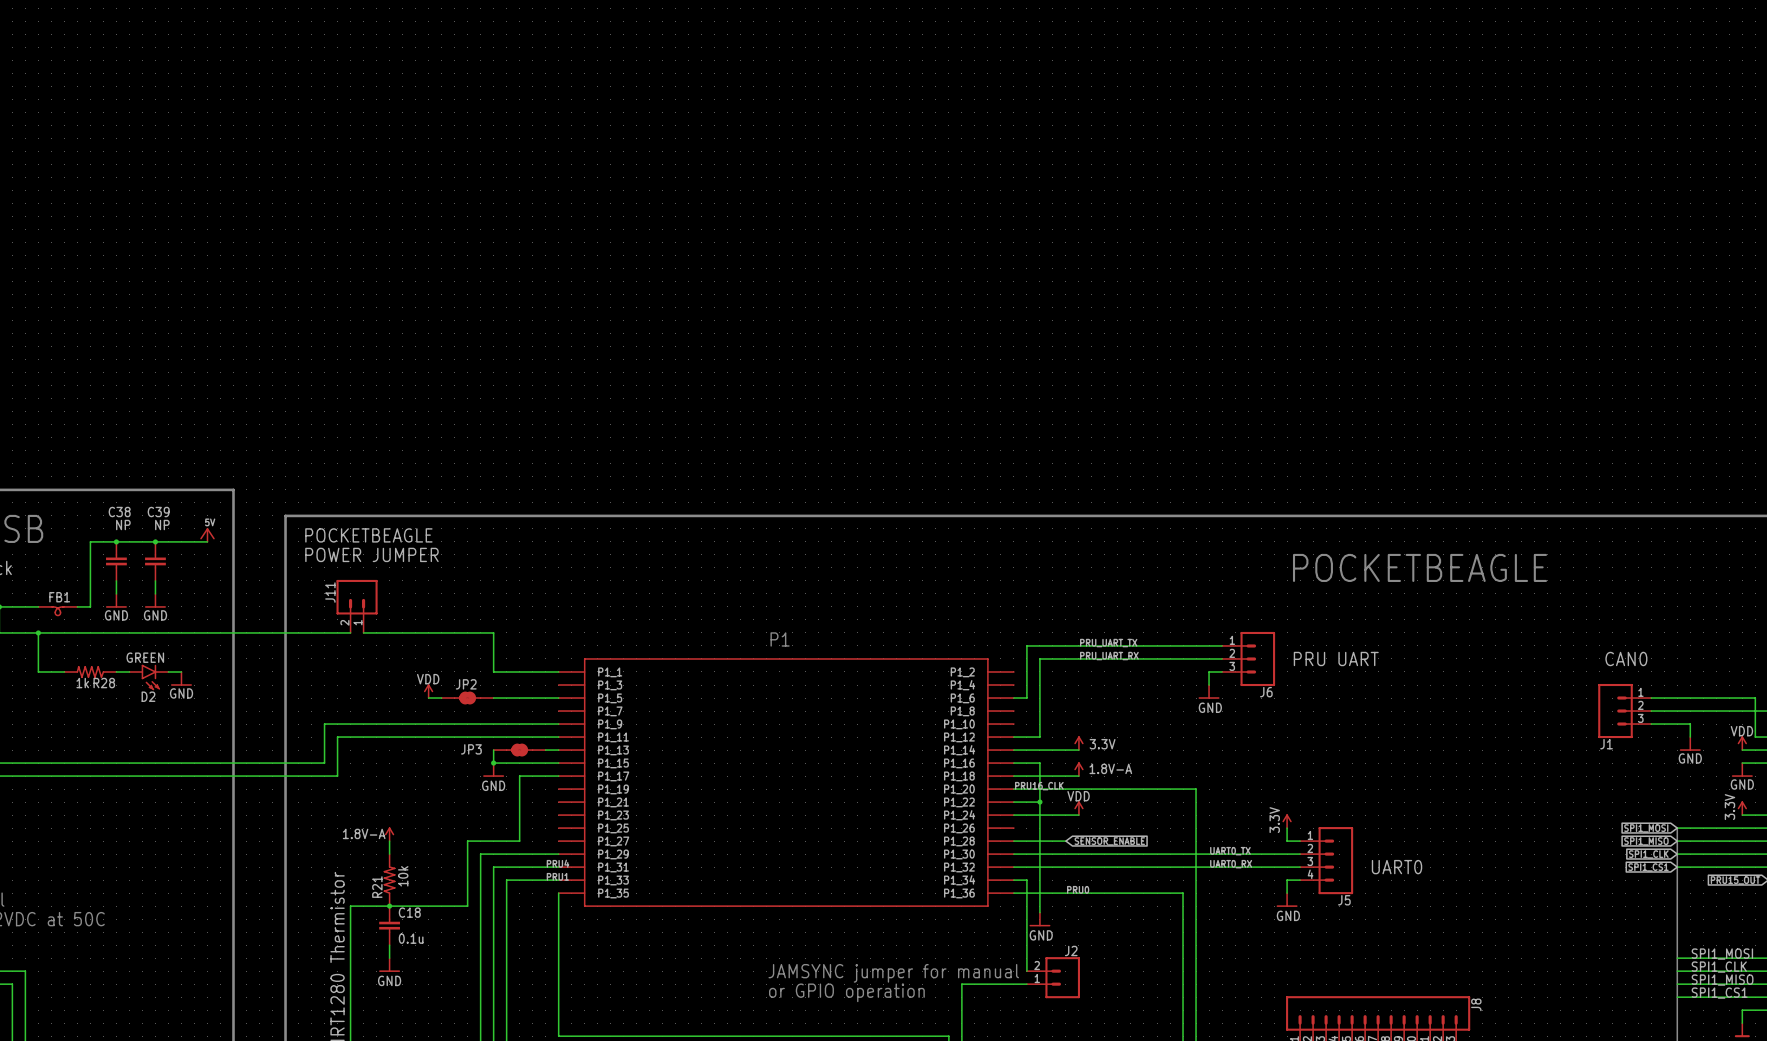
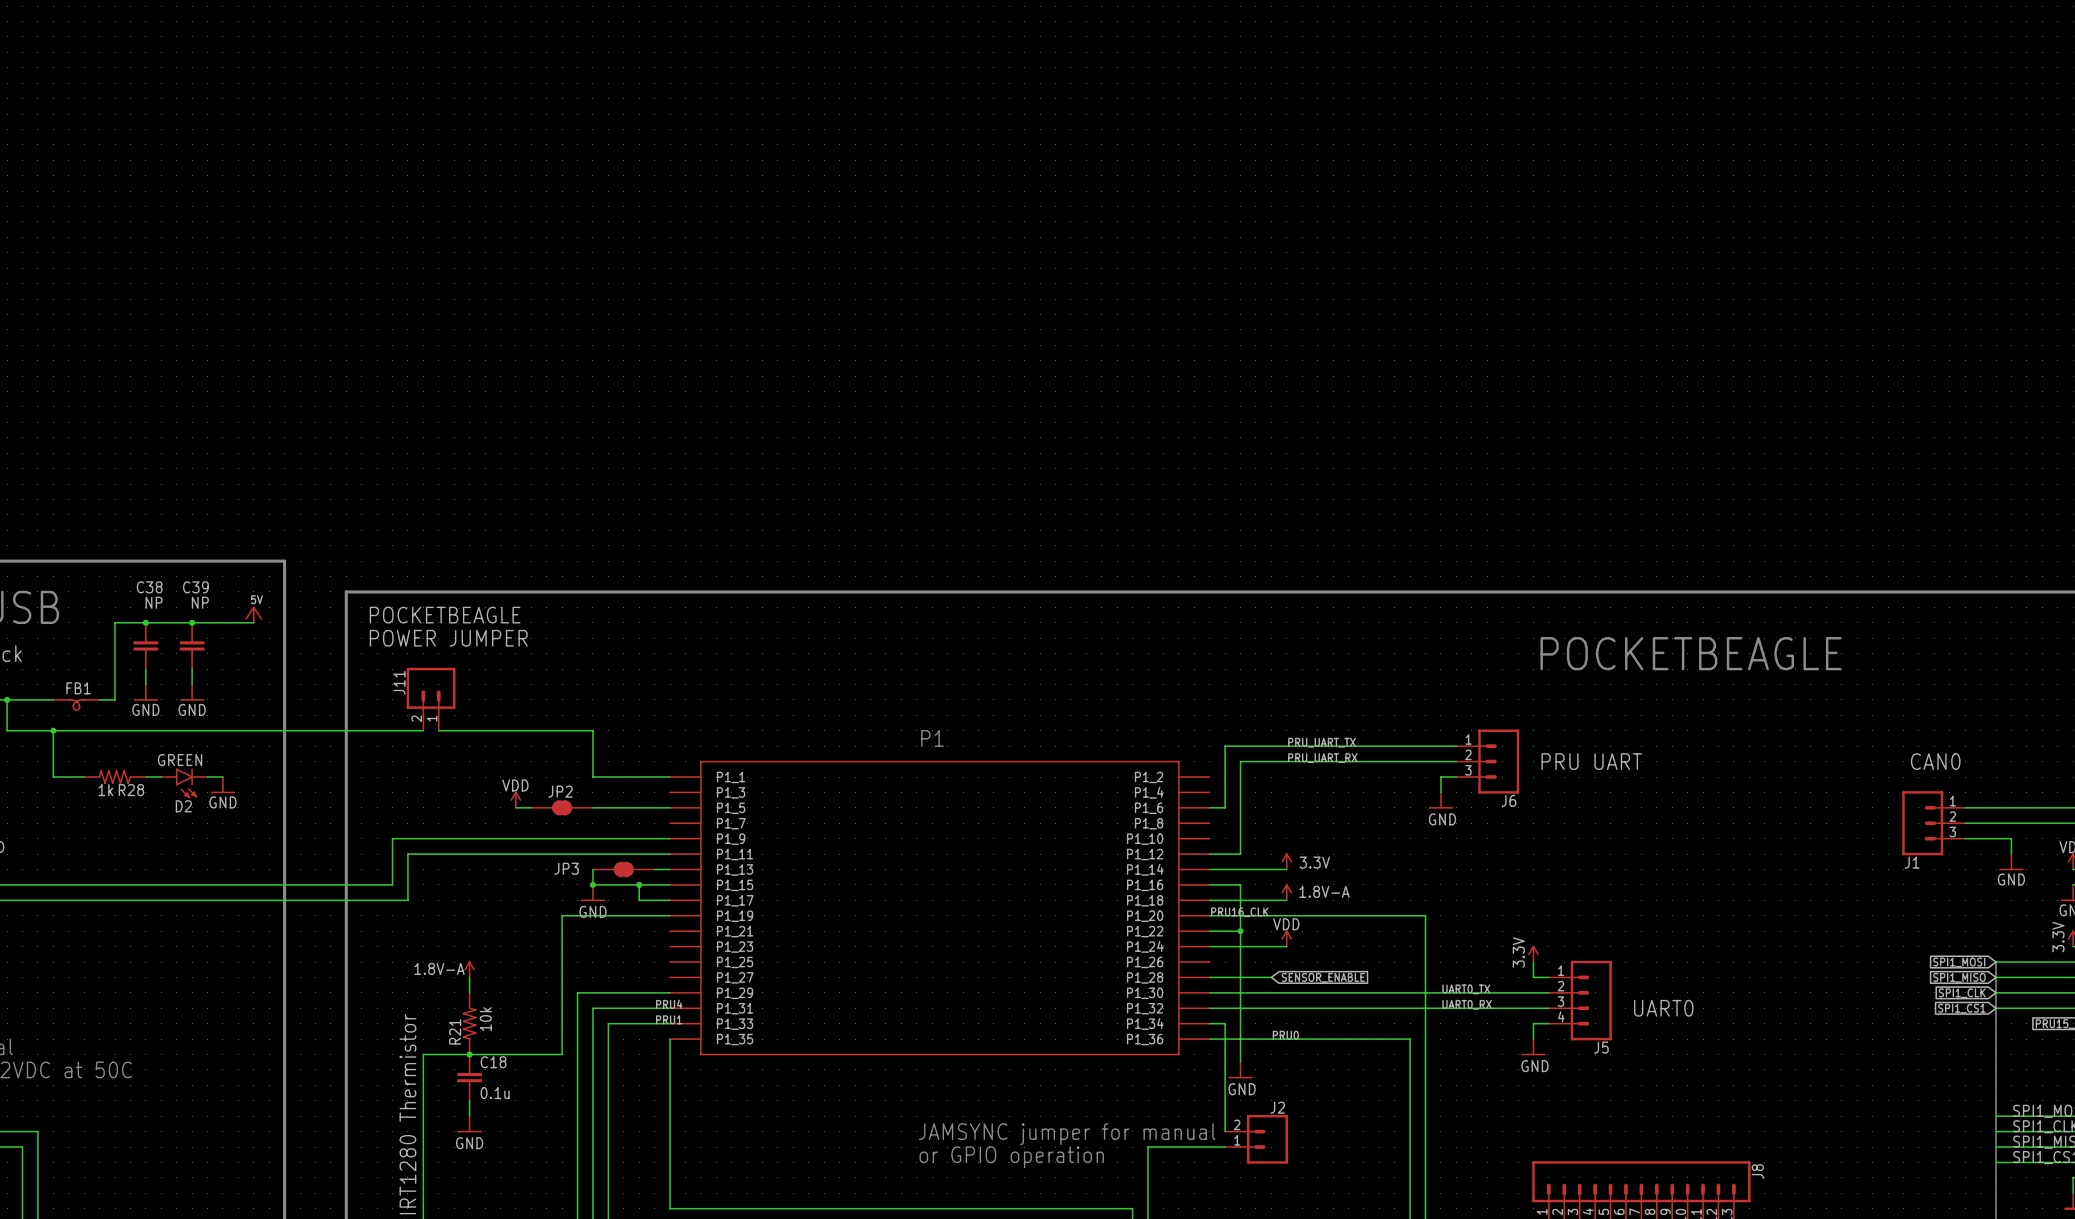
wire: none -> (639, 884) (639, 900)
junction: none -> (639, 884)
wire: (532, 776) (519, 776) (519, 841) (467, 841) -> (670, 915) (562, 915) (562, 977)

